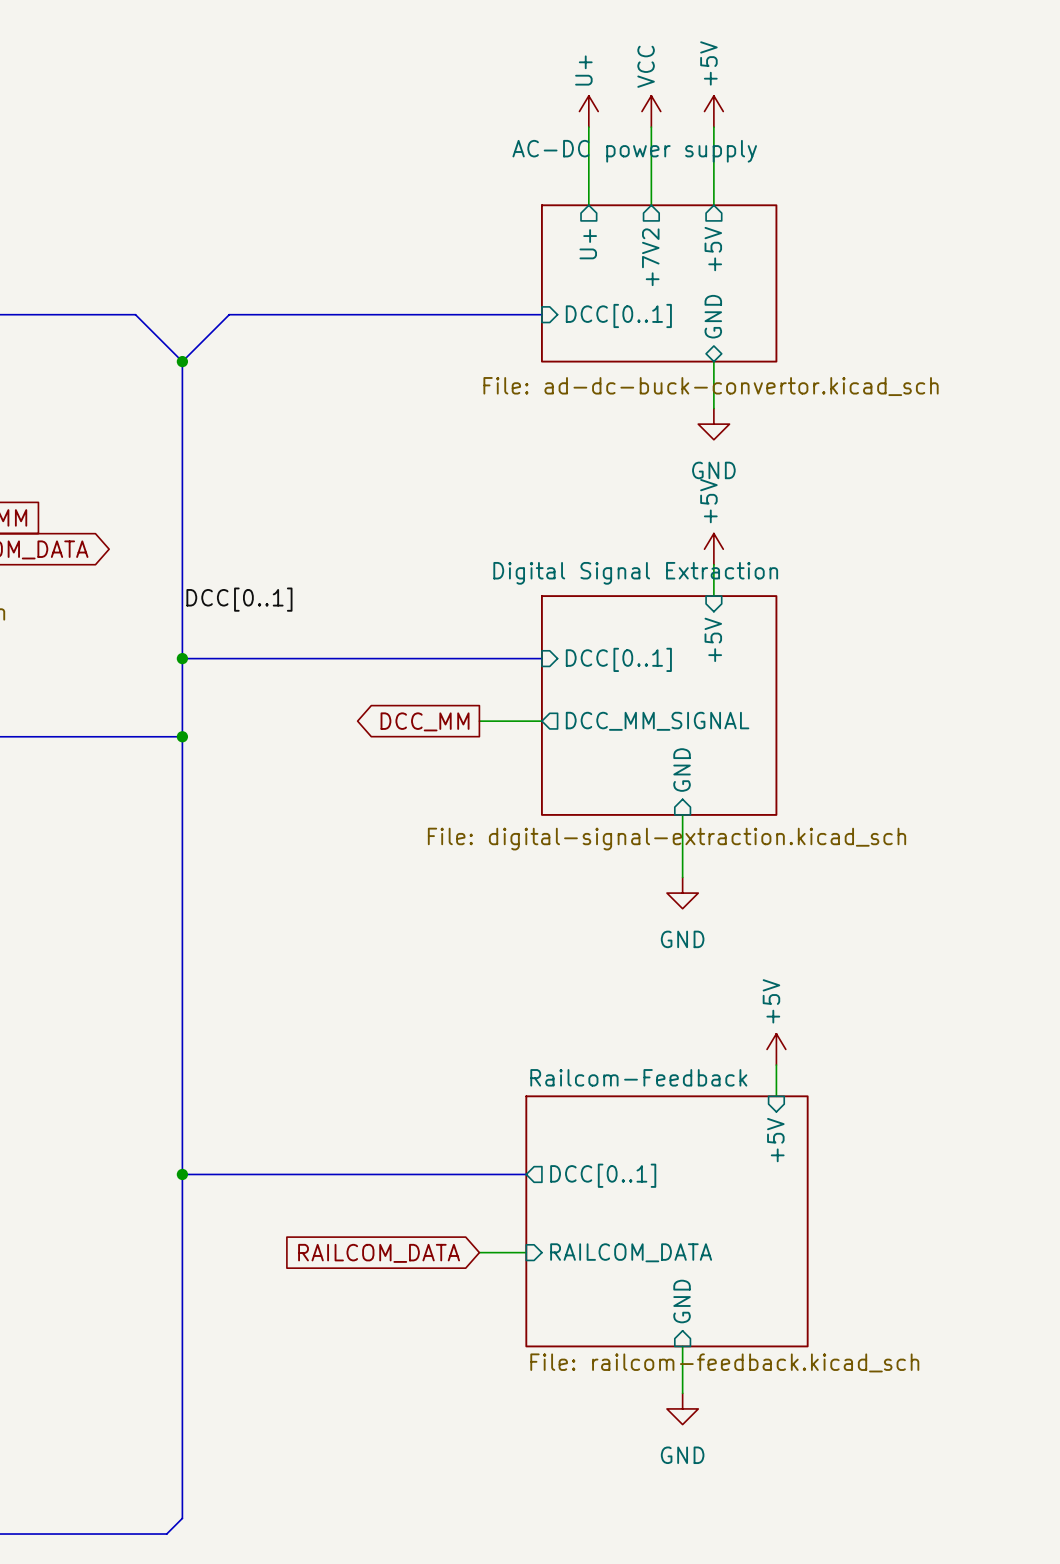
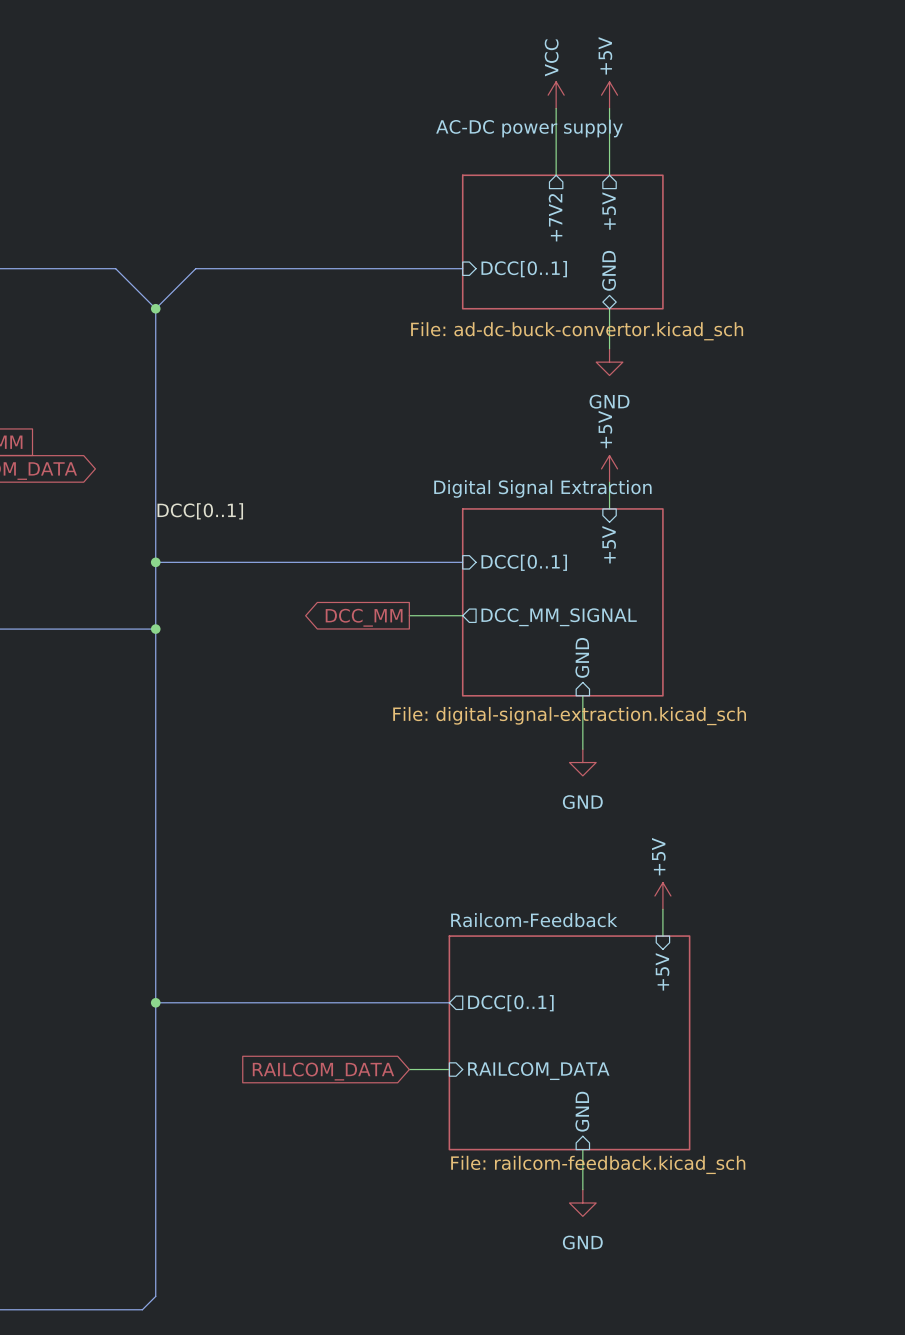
power symbol: U+ (588, 111) -> none
wire: (588, 127) (588, 205) -> none
sheet pin: U+ (588, 244) -> none

